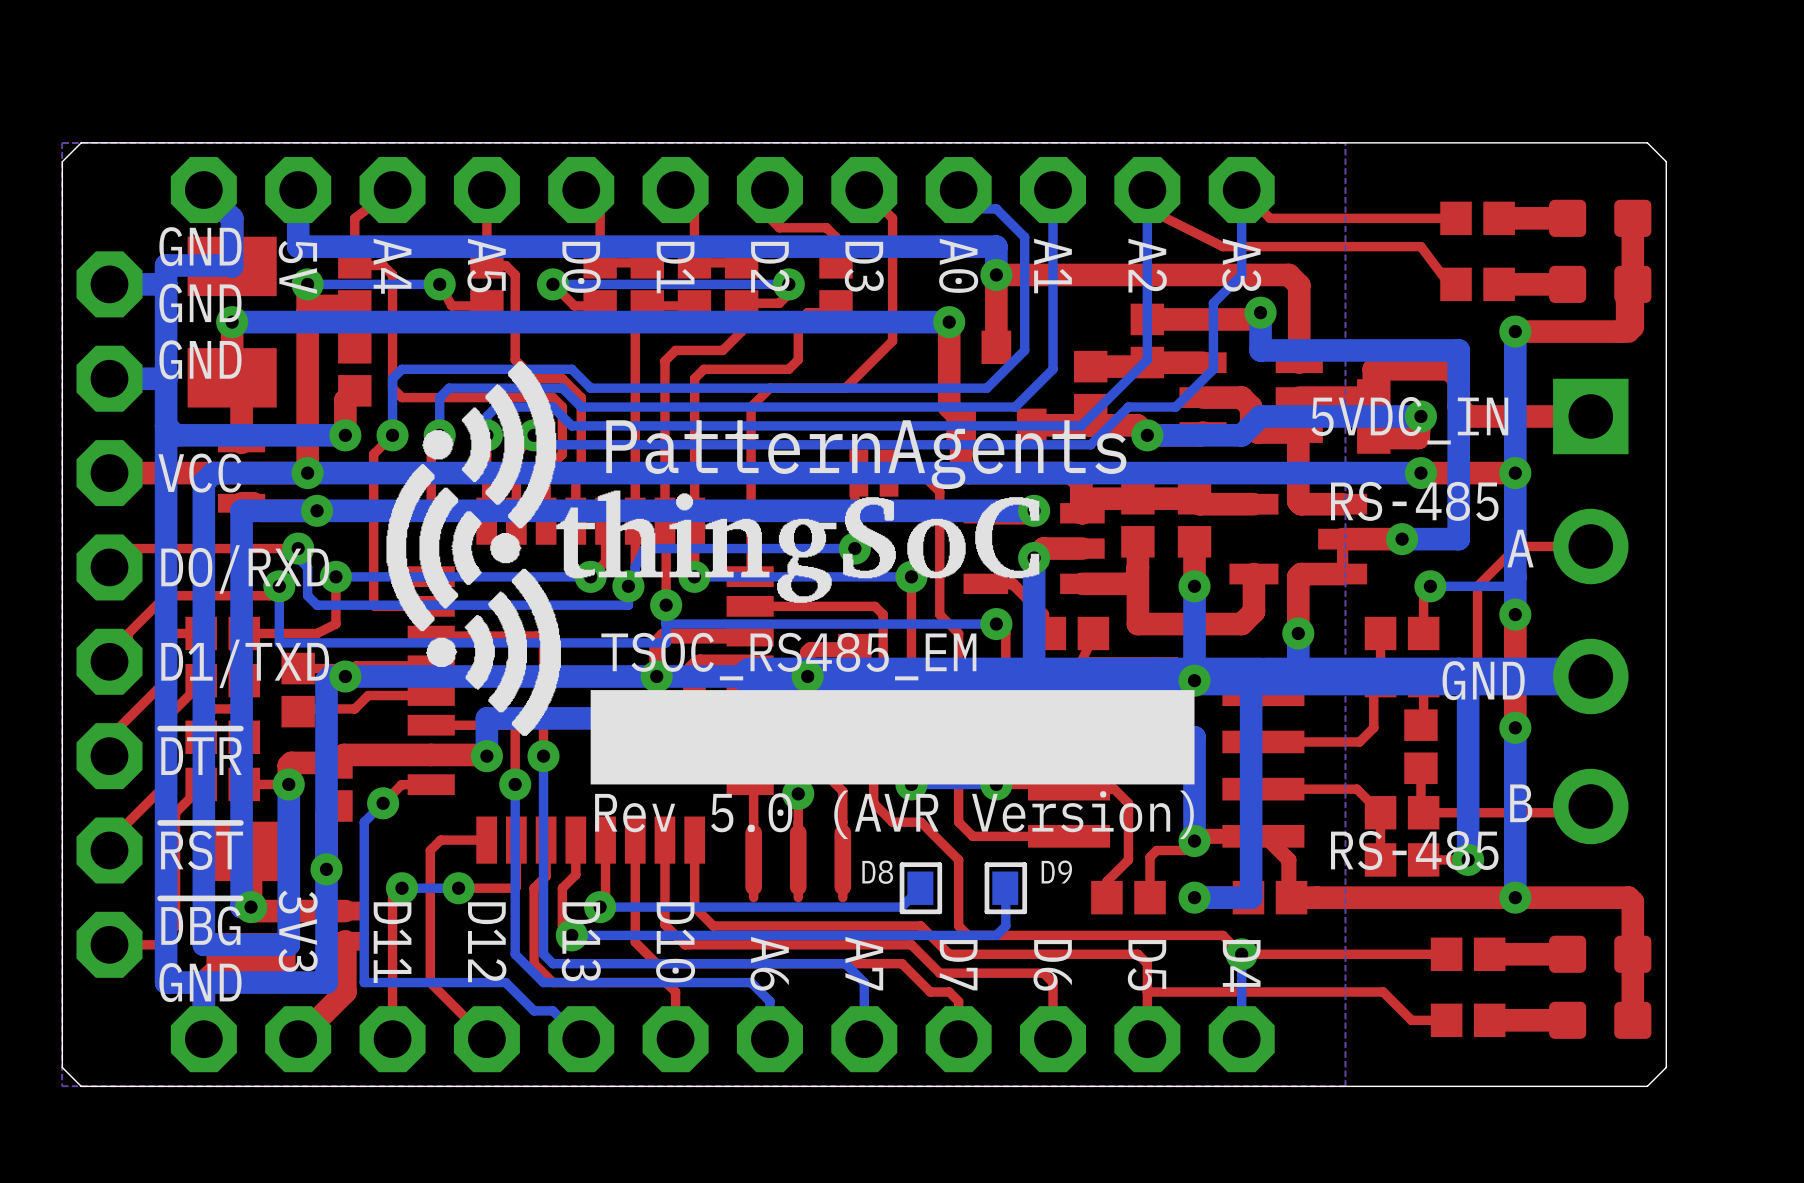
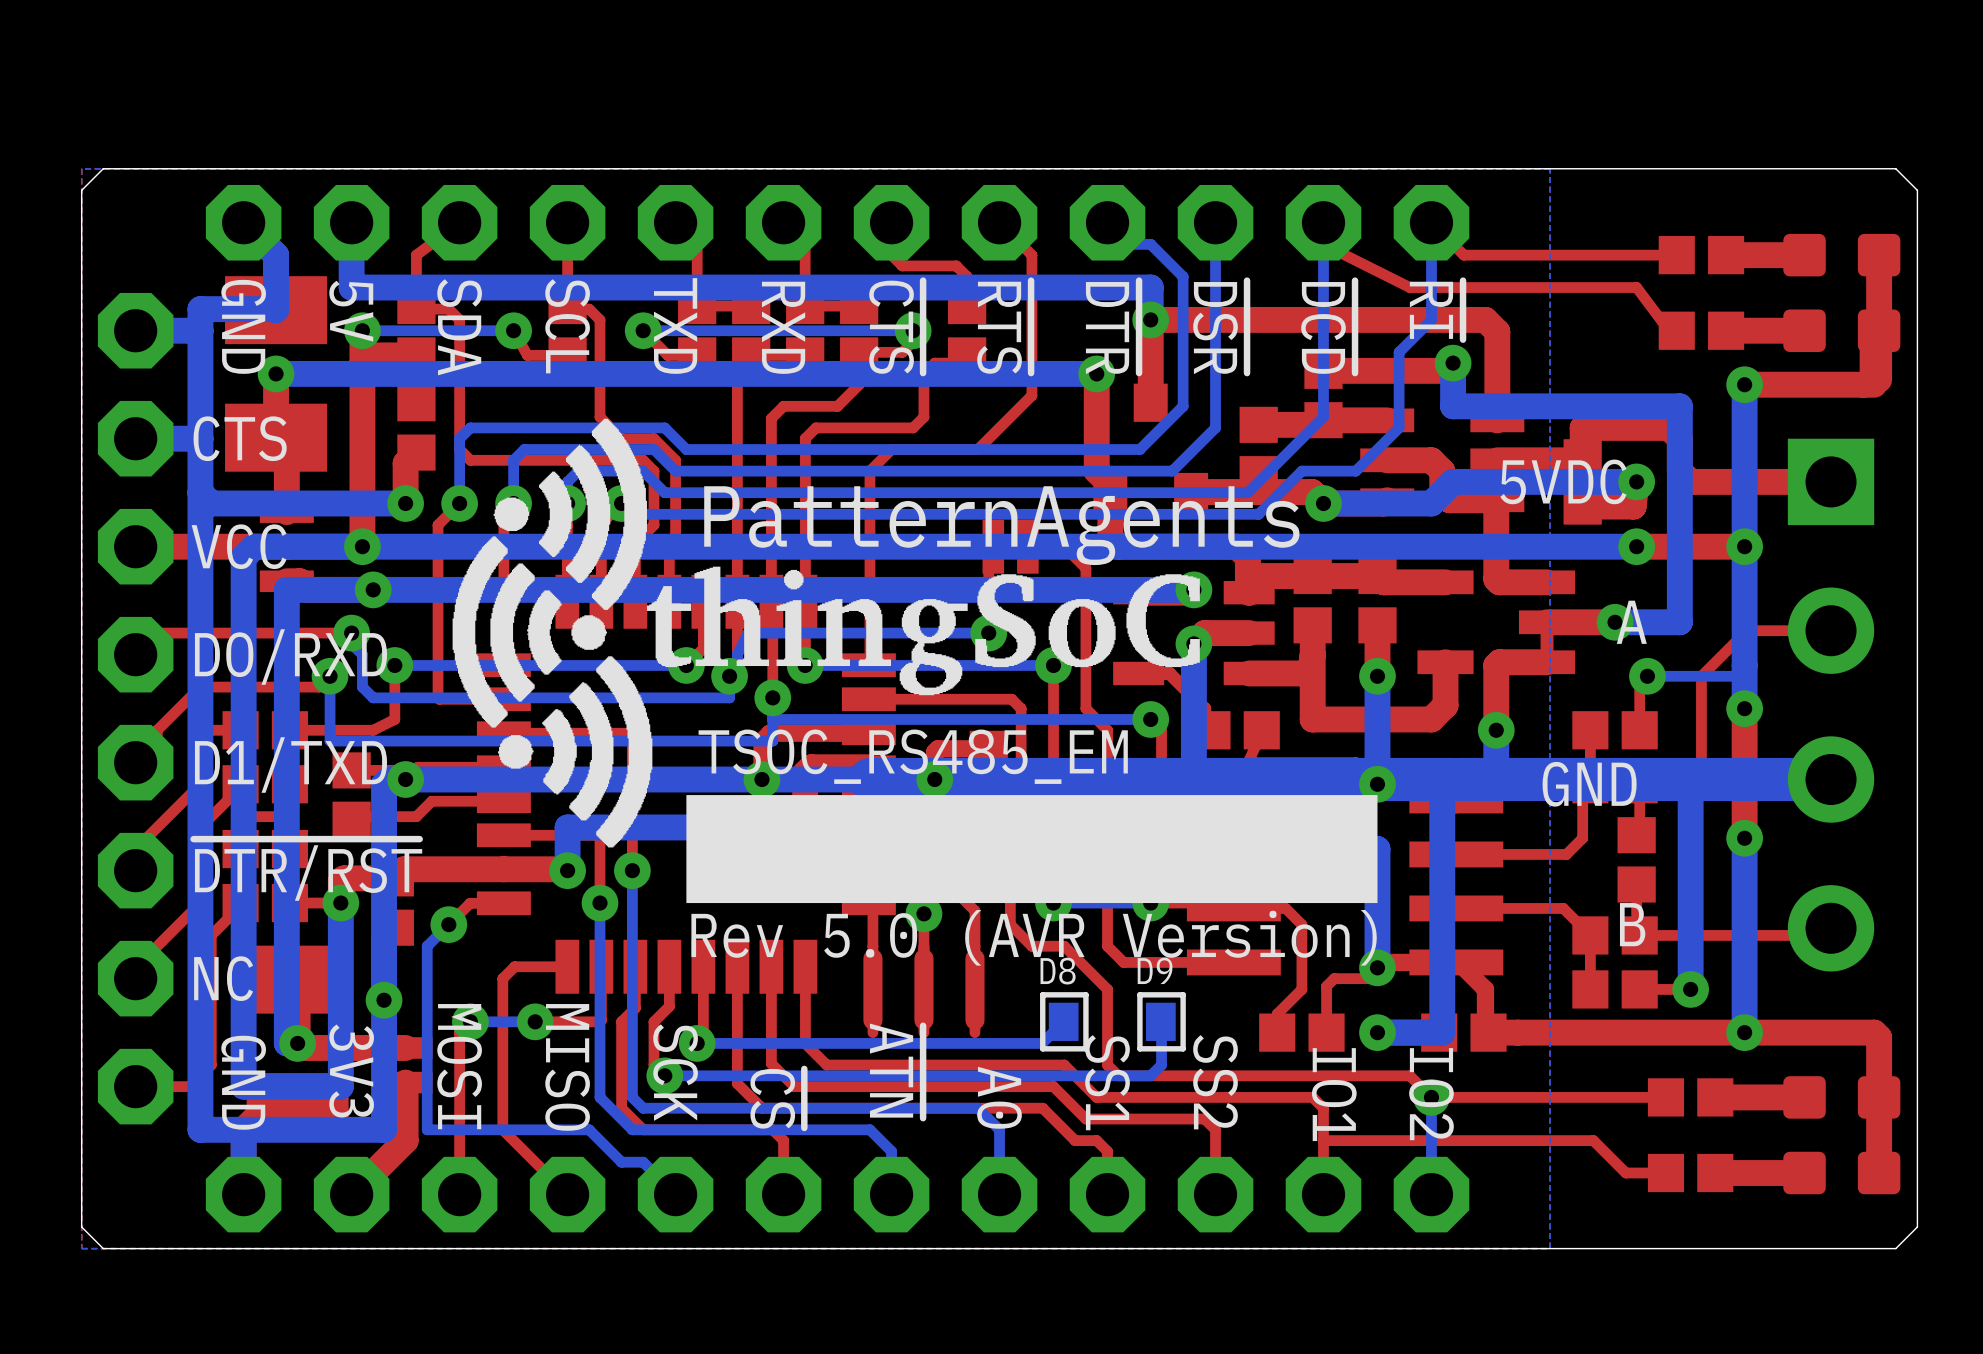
text rotation: 0° (200, 246) -> 90° clockwise (243, 326)
text: A5 (486, 265) -> SCL (567, 326)
text: A0 (958, 265) -> ~{DTR} (1112, 327)
text: A2 (1147, 265) -> ~{DCD} (1328, 327)
text: A3 (1241, 265) -> ~{RI} (1436, 310)
text: A4 (392, 266) -> SDA (459, 327)
text: D3 (864, 266) -> ~{RTS} (1004, 327)
text: A1 (1053, 266) -> ~{DSR} (1220, 327)
text: D0 (581, 267) -> TXD (675, 326)
text: D1 (675, 267) -> RXD (783, 327)
text: D2 (770, 267) -> ~{CTS} (896, 327)
text: GND (200, 303) -> none
text: GND (200, 359) -> CTS (240, 438)
text: 5VDC_IN (1409, 420) -> 5VDC (1563, 481)
text: RS-485 (1414, 501) -> none
text position: A (1520, 548) -> A (1631, 622)
text position: GND (1483, 680) -> GND (1589, 784)
text: ~{DTR} (200, 751) -> ~{DTR/RST} (307, 869)
text position: B (1521, 803) -> B (1632, 924)
text: ~{RST} (201, 846) -> NC (223, 978)
text: RS-485 (1414, 850) -> none
D9 name position: D9 (1056, 871) -> D9 (1155, 970)
D8 name position: D8 (877, 872) -> D8 (1058, 971)
text: ~{DBG} (200, 921) -> none
text: none -> ~{ATN} (896, 1070)
text: D13 (581, 941) -> SCK (675, 1072)
text: none -> SS1 (1107, 1082)
text: none -> SS2 (1215, 1082)
text: D11 (392, 942) -> MOSI (459, 1066)
text: D12 (487, 942) -> MISO (567, 1067)
text: D10 (675, 942) -> ~{CS} (777, 1098)
text: A6 (769, 963) -> none
text: A7 (864, 963) -> A0 (999, 1097)
text: D7 (958, 965) -> none
text: D6 (1052, 965) -> none
text: D5 (1147, 965) -> IO1 (1334, 1094)
text: D4 (1241, 965) -> IO2 (1431, 1094)
text rotation: 0° (200, 982) -> 90° clockwise (243, 1082)

